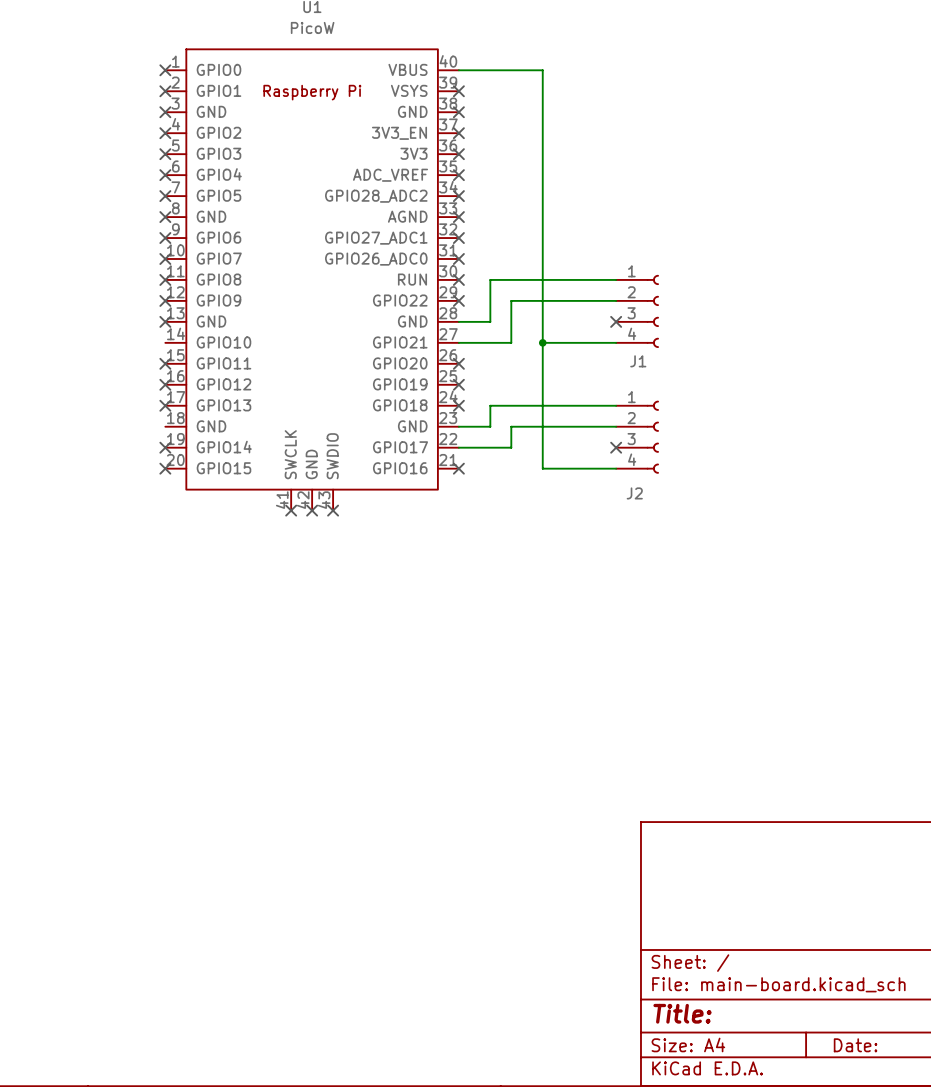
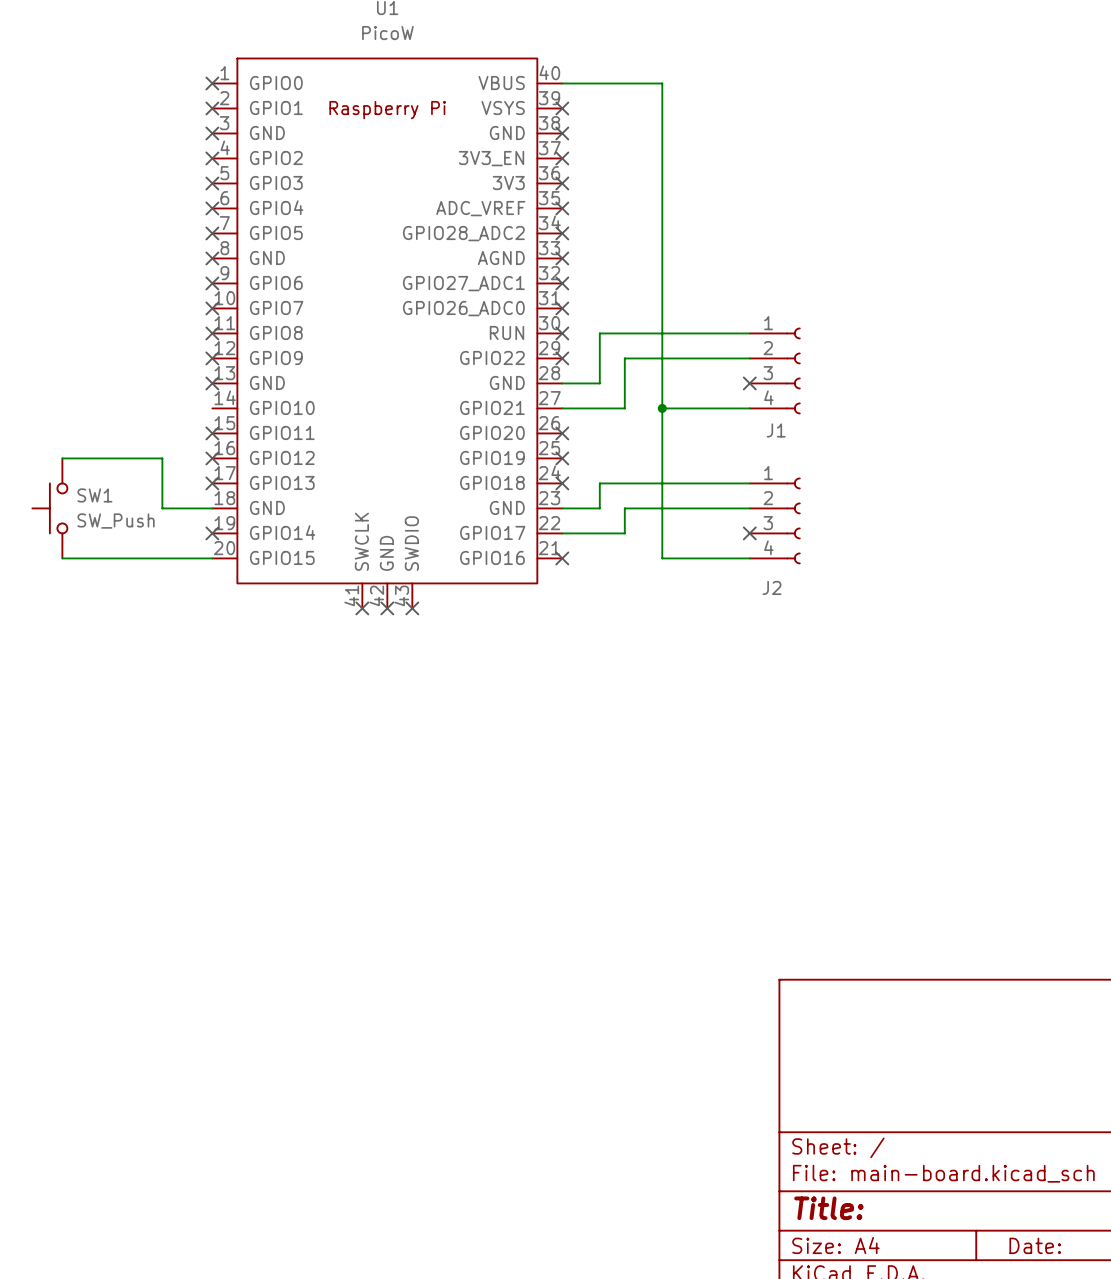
wire: none -> (62, 458) (162, 458) (162, 508) (212, 508)
SW1: none -> SW_Push (49, 508)
wire: none -> (62, 558) (212, 558)
no-connect mark: (165, 468) -> none

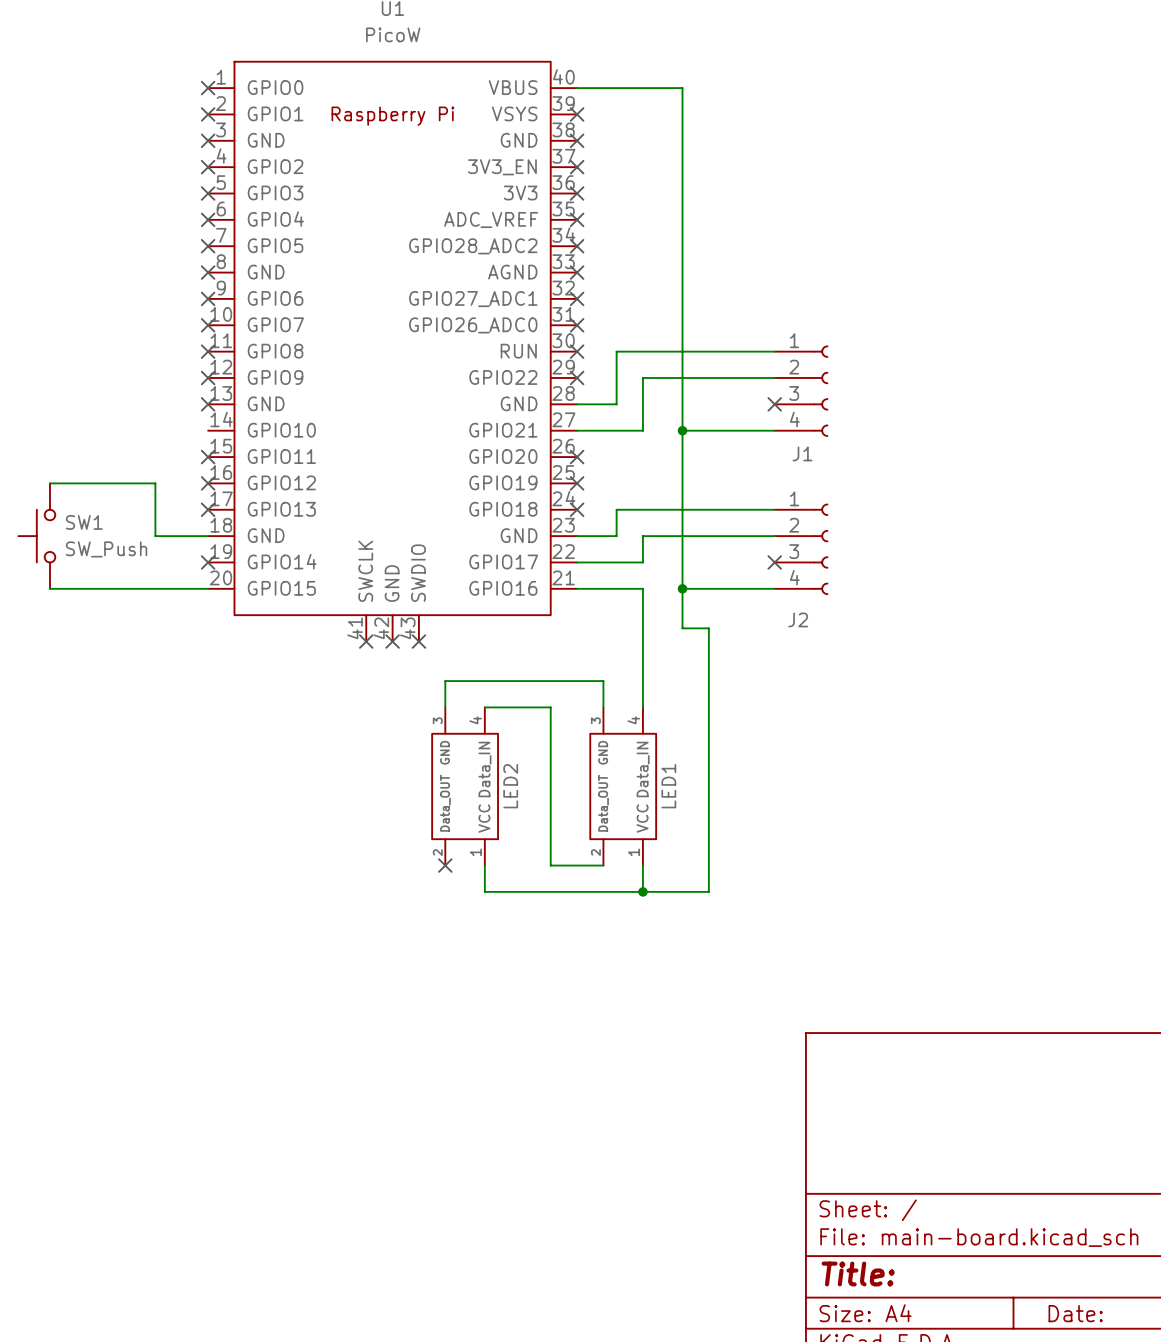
wire: none -> (577, 588) (642, 588) (642, 707)
no-connect mark: (562, 558) -> none
wire: none -> (682, 588) (682, 628) (708, 628) (708, 891) (484, 891) (484, 865)
junction: none -> (682, 588)
wire: none -> (445, 707) (445, 681) (603, 681) (603, 707)
wire: none -> (484, 707) (550, 707) (550, 865) (603, 865)
LED2: none -> (465, 786)
LED1: none -> (623, 786)
no-connect mark: none -> (445, 865)
wire: none -> (642, 865) (642, 891)
junction: none -> (642, 891)

